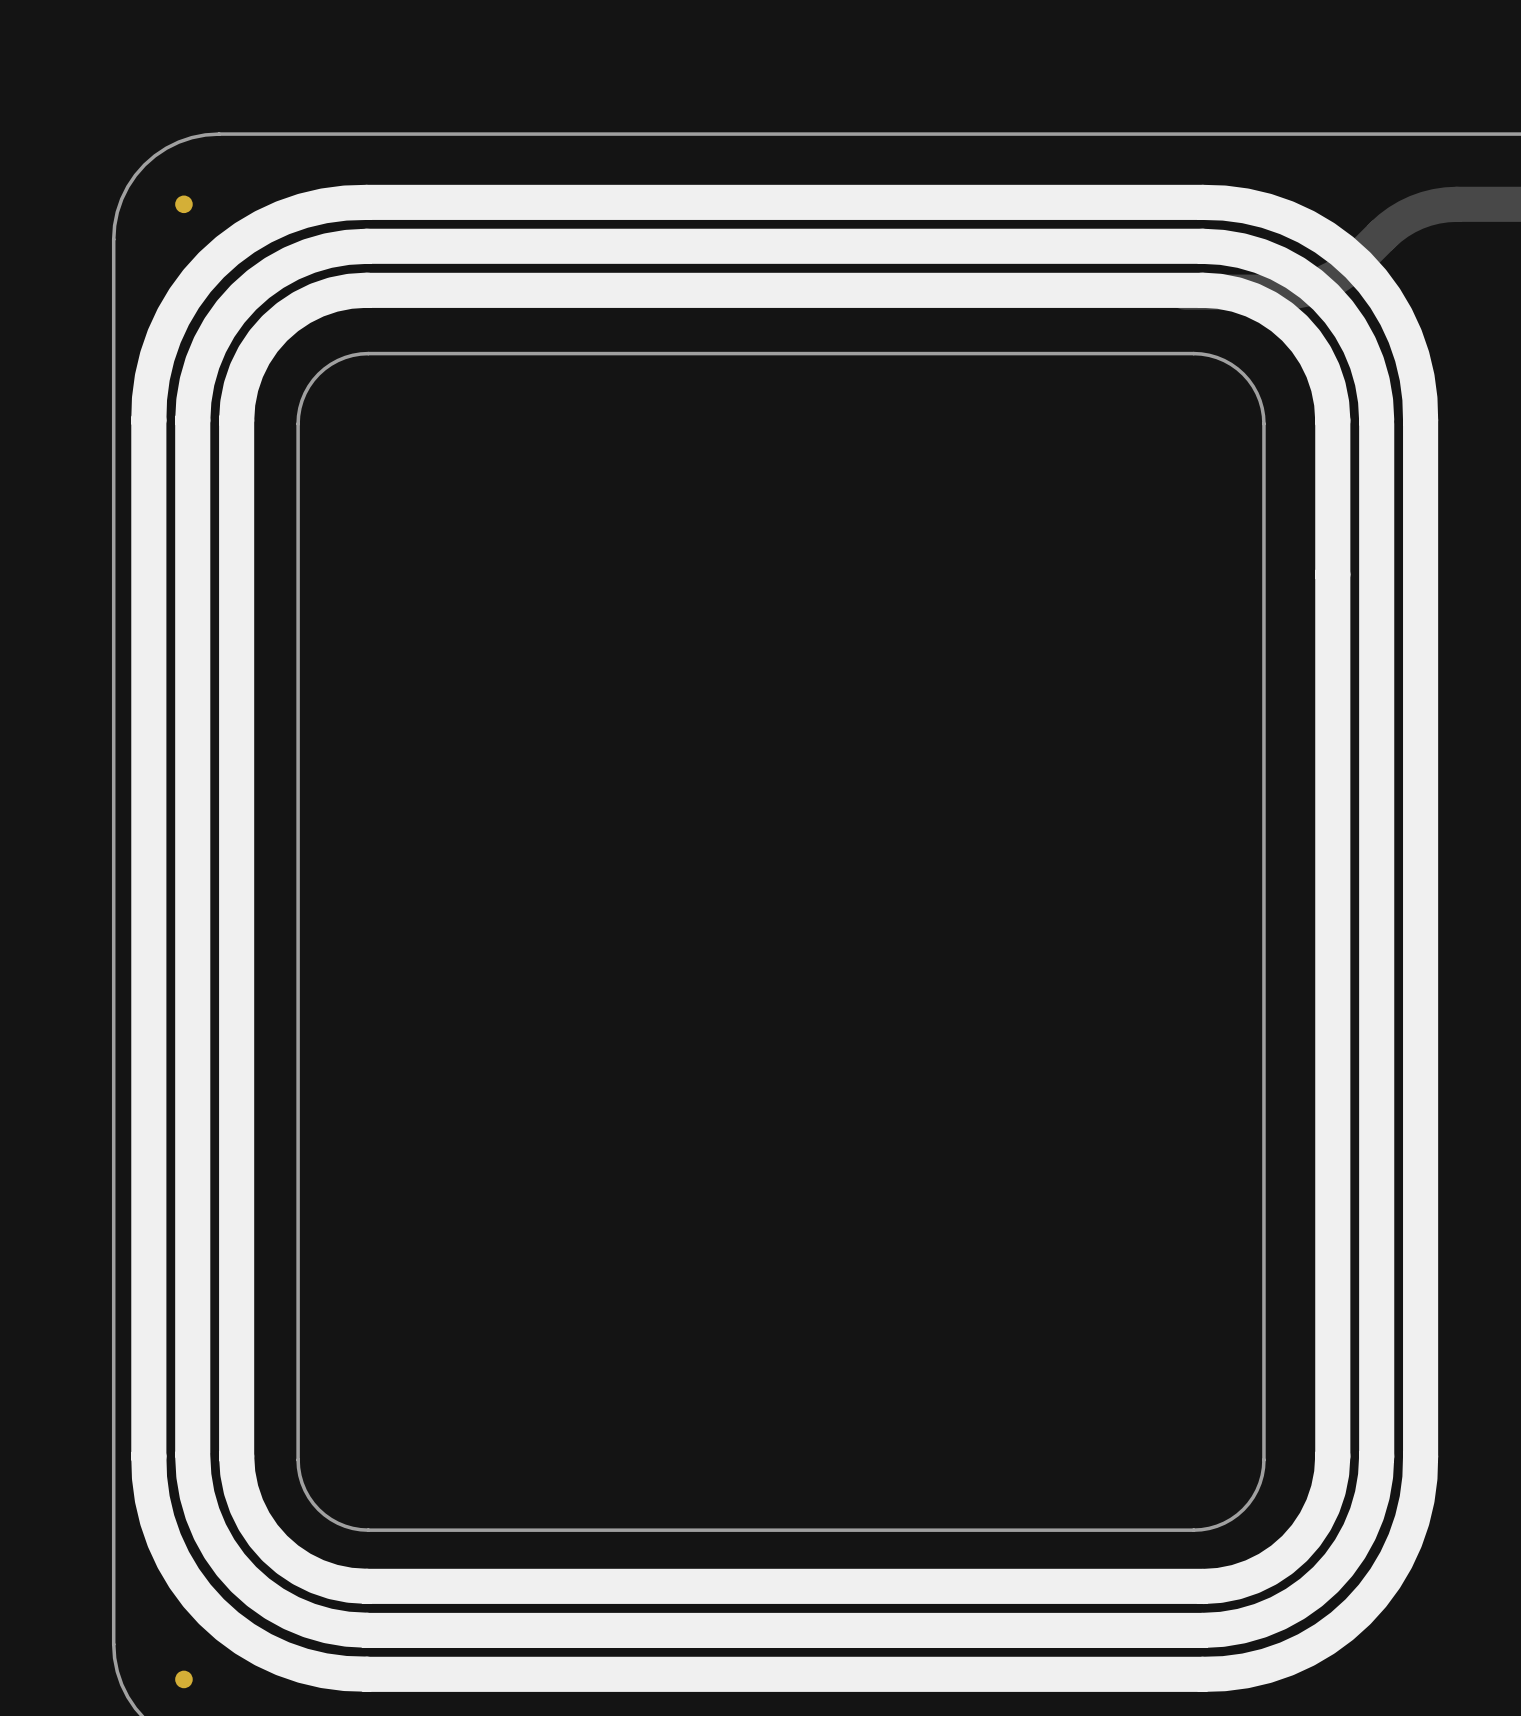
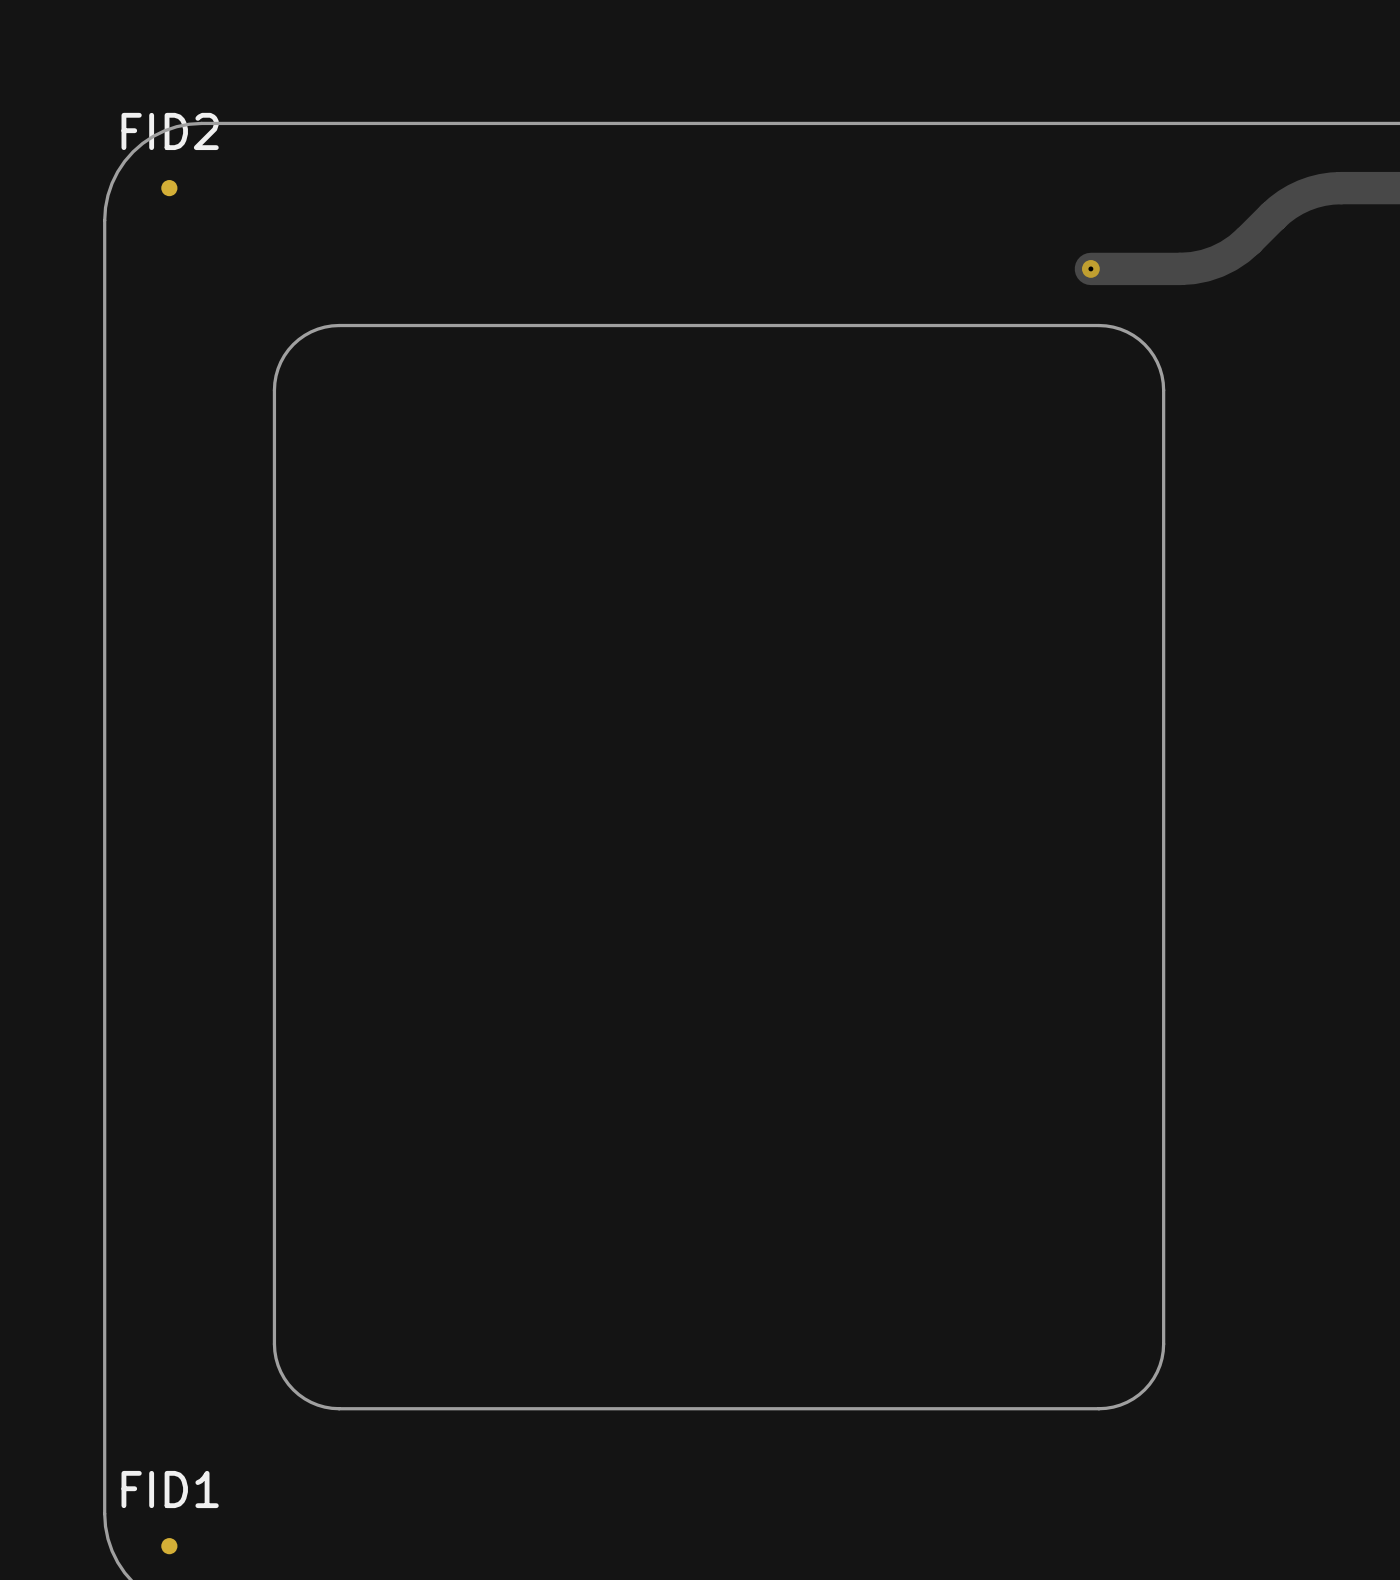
FID2 name: none -> FID2 (170, 131)
line: (366, 202) (1224, 203) (1266, 210) (1306, 226) (1324, 237) (1358, 264) (1385, 298) (1396, 316) (1412, 356) (1417, 377) (1420, 420) (1419, 1477) (1412, 1520) (1405, 1540) (1385, 1578) (1358, 1611) (1324, 1638) (1286, 1658) (1266, 1665) (1224, 1673) (345, 1673) (303, 1665) (263, 1649) (227, 1626) (211, 1611) (184, 1578) (173, 1559) (157, 1519) (152, 1499) (148, 1456) (148, 420) (152, 377) (164, 336) (184, 298) (211, 264) (227, 250) (263, 226) (303, 210) (323, 205) (366, 202) -> none
line: (366, 290) (1202, 290) (1219, 291) (1252, 300) (1281, 317) (1305, 341) (1322, 370) (1328, 386) (1332, 420) (1332, 1456) (1328, 1490) (1322, 1506) (1305, 1535) (1281, 1559) (1267, 1569) (1236, 1582) (1202, 1586) (366, 1586) (333, 1581) (301, 1568) (274, 1548) (263, 1535) (246, 1506) (241, 1489) (236, 1456) (237, 403) (246, 370) (263, 341) (274, 328) (301, 307) (316, 300) (333, 294) (366, 290) -> none
line: (1376, 420) (1375, 400) (1366, 362) (1359, 344) (1338, 311) (1311, 284) (1295, 272) (1260, 256) (1222, 247) (366, 246) (328, 250) (309, 256) (291, 263) (258, 284) (230, 311) (209, 344) (197, 381) (192, 420) (192, 1452) -> none
line: (1376, 423) (1376, 1456) (1372, 1495) (1359, 1531) (1338, 1564) (1311, 1592) (1295, 1603) (1260, 1620) (1222, 1629) (1202, 1630) (347, 1629) (328, 1625) (291, 1613) (258, 1592) (230, 1564) (209, 1531) (202, 1513) (193, 1475) (192, 1456) -> none
FID1 name: none -> FID1 (170, 1489)

